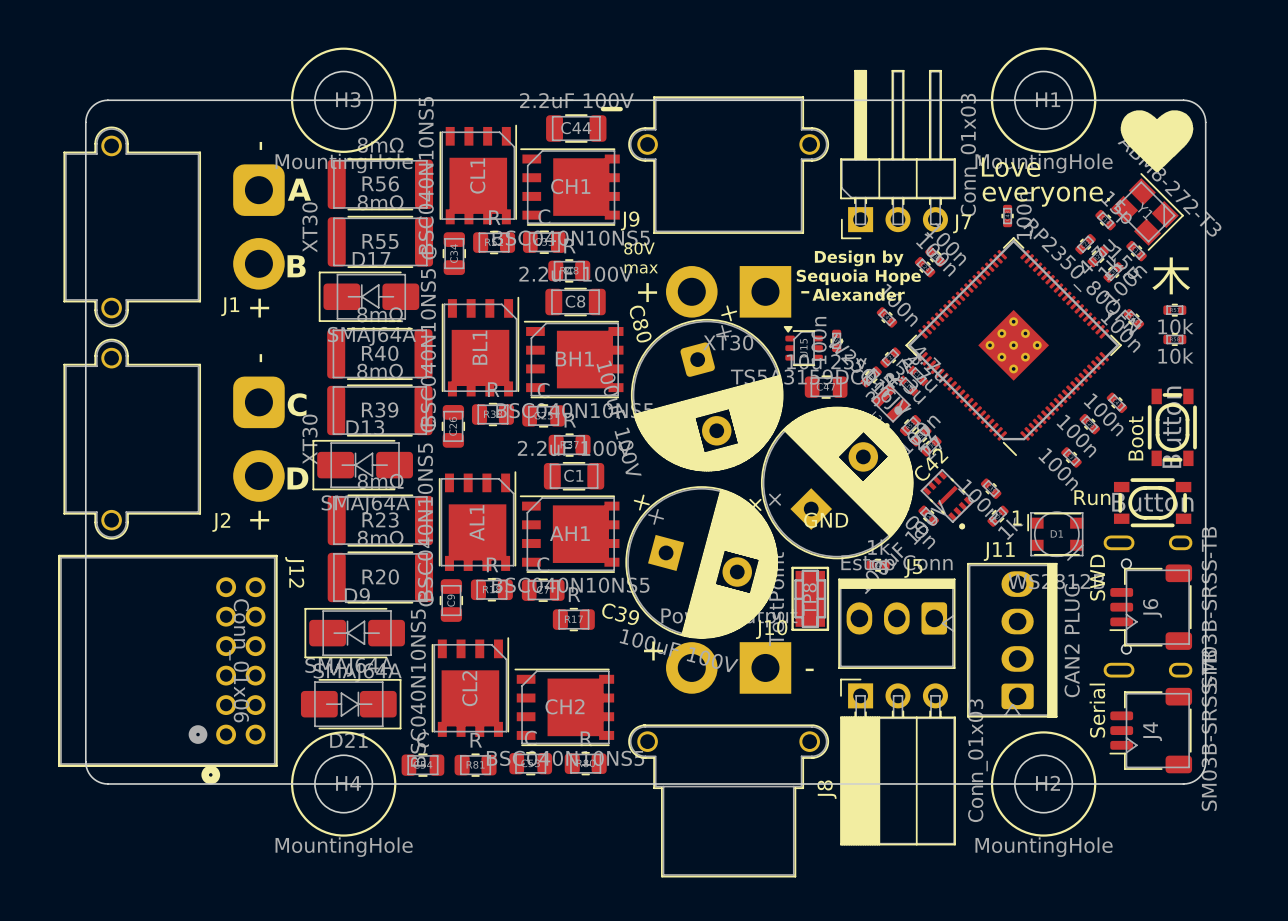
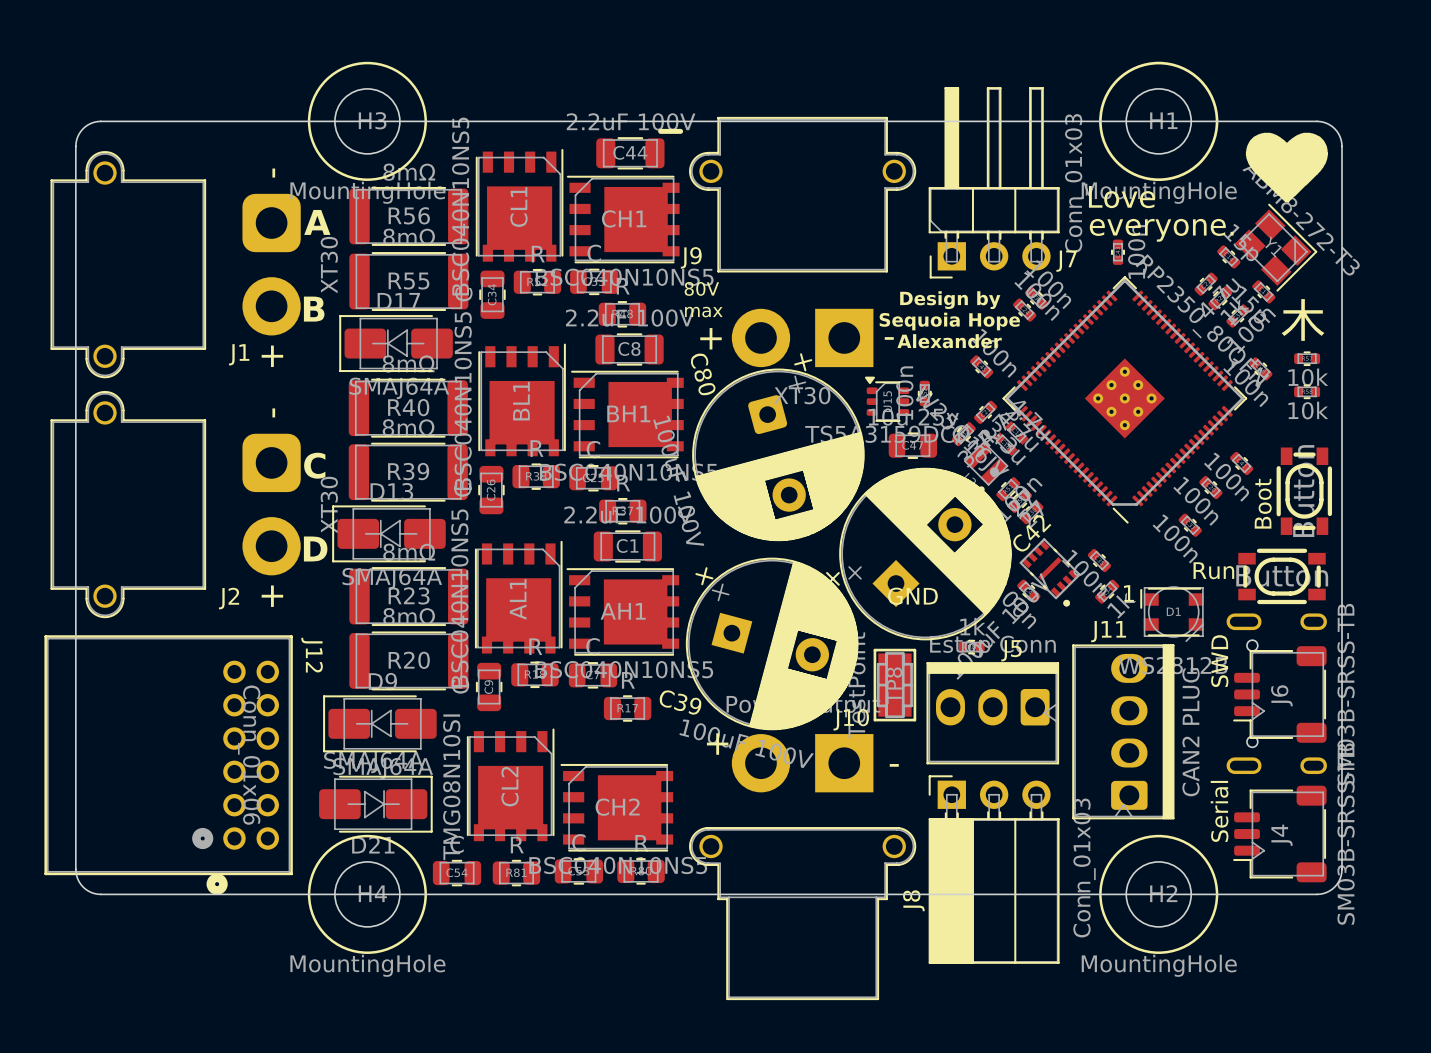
CL2 value: BSC040N10NS5 (418, 688) -> TMG08N10SI (451, 787)

